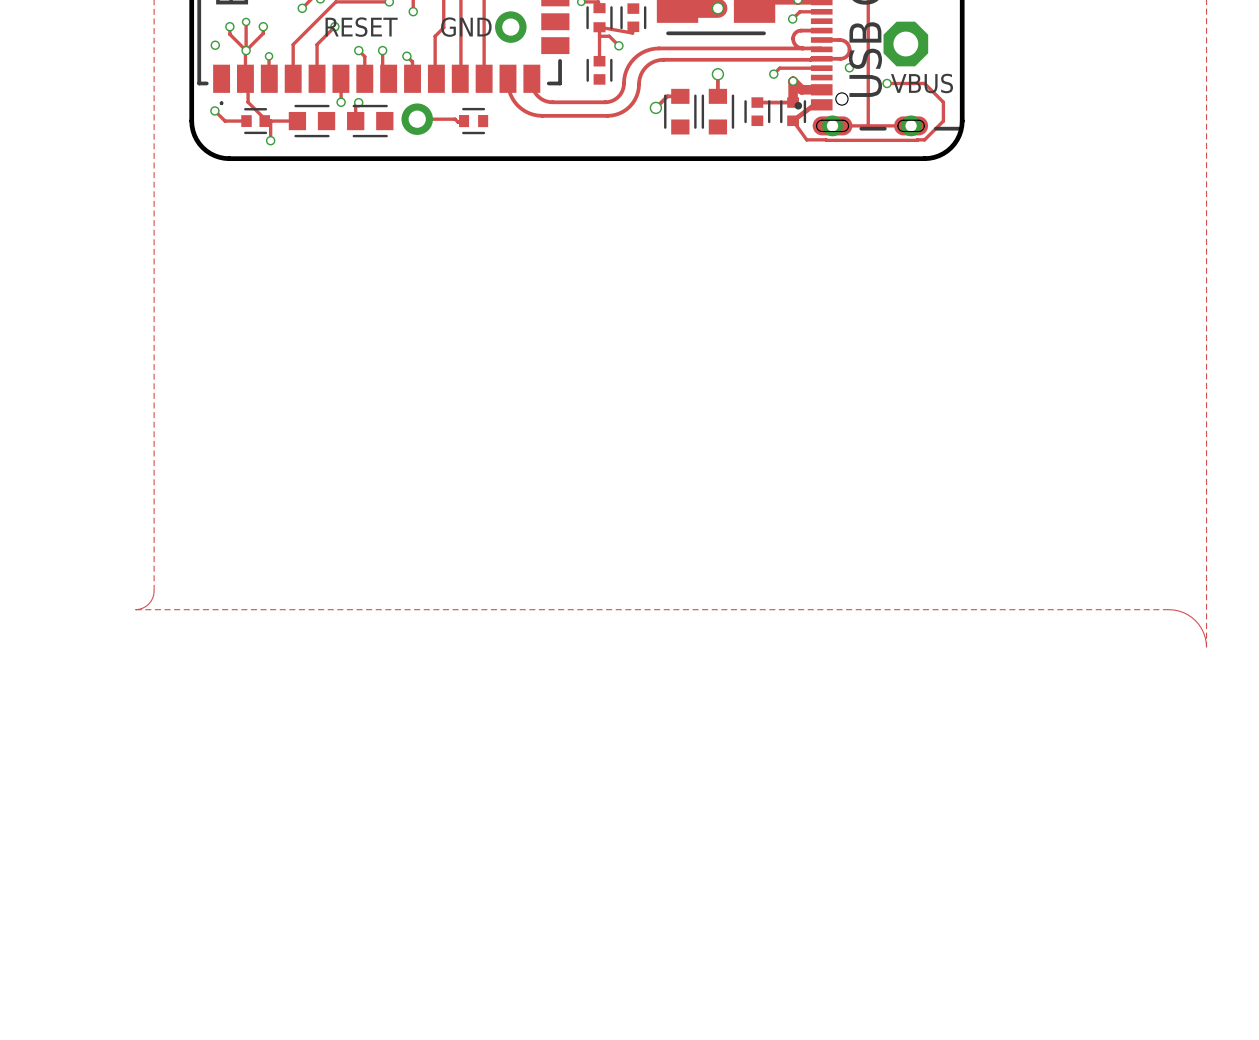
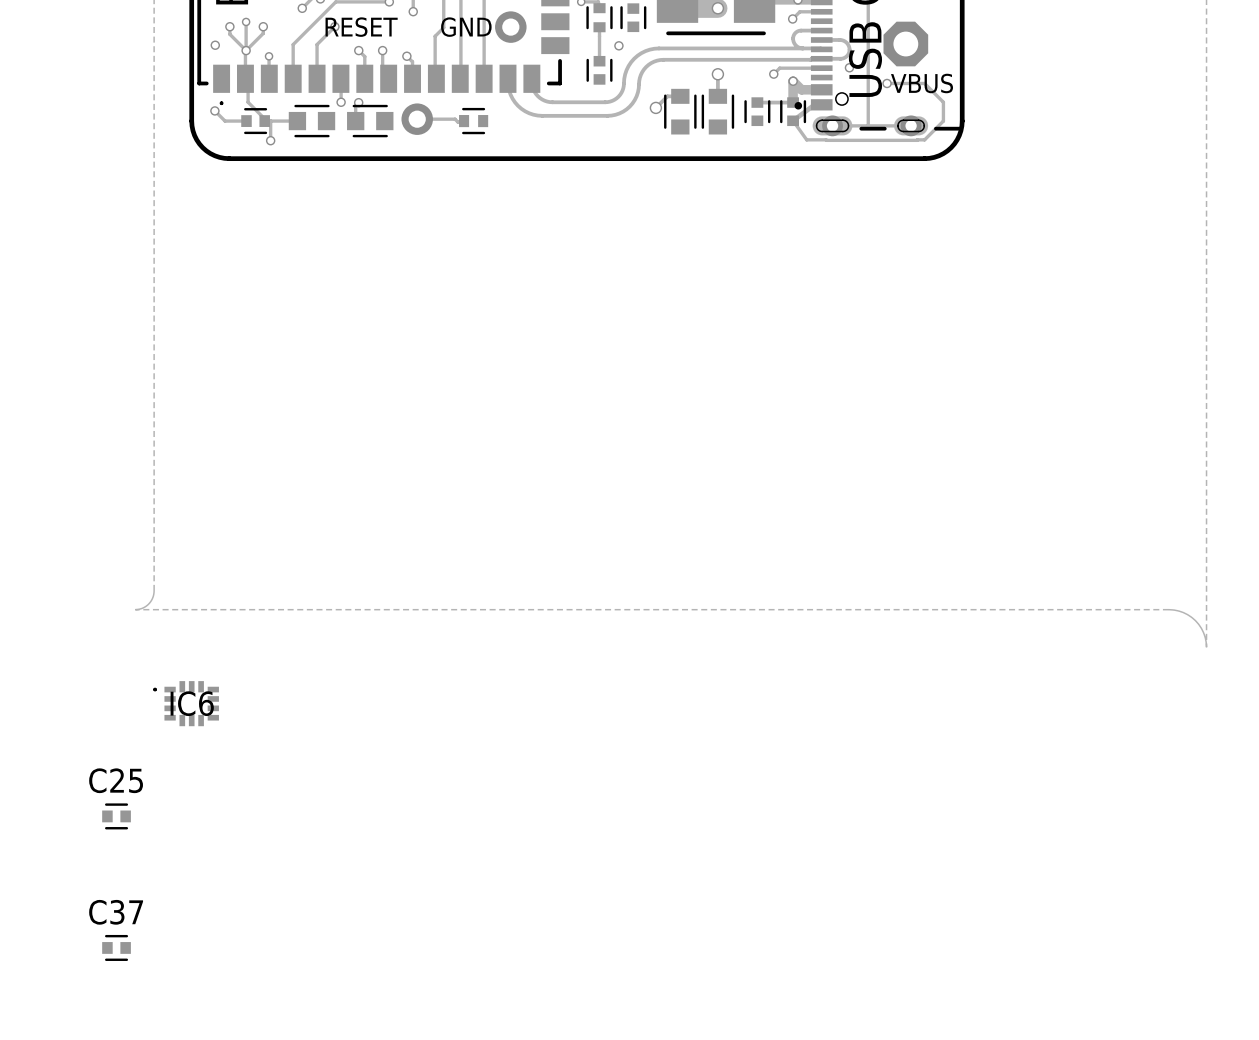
track: (633, 26) (632, 33) (599, 27) -> none
track: (599, 36) (609, 36) (618, 45) -> none
IC6: none -> (186, 703)
C25: none -> (116, 816)
C37: none -> (116, 947)

